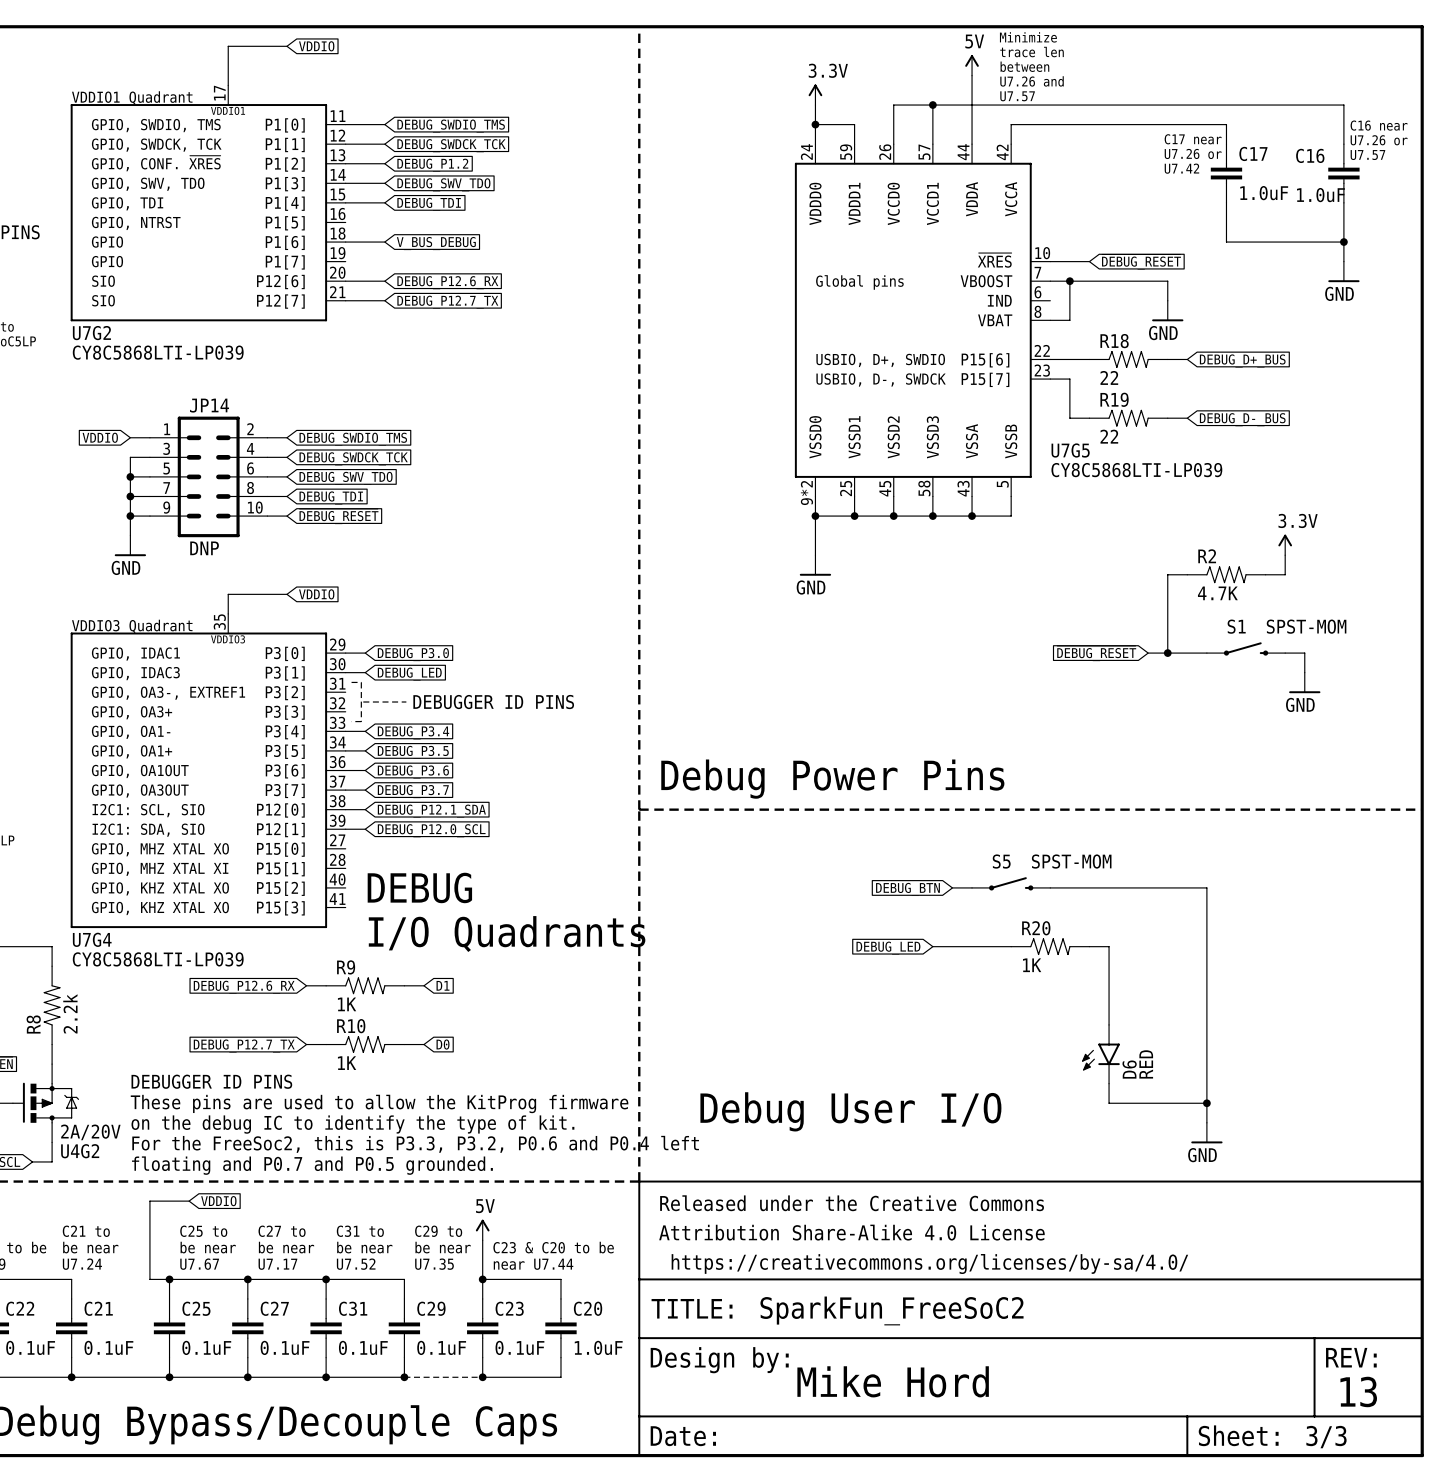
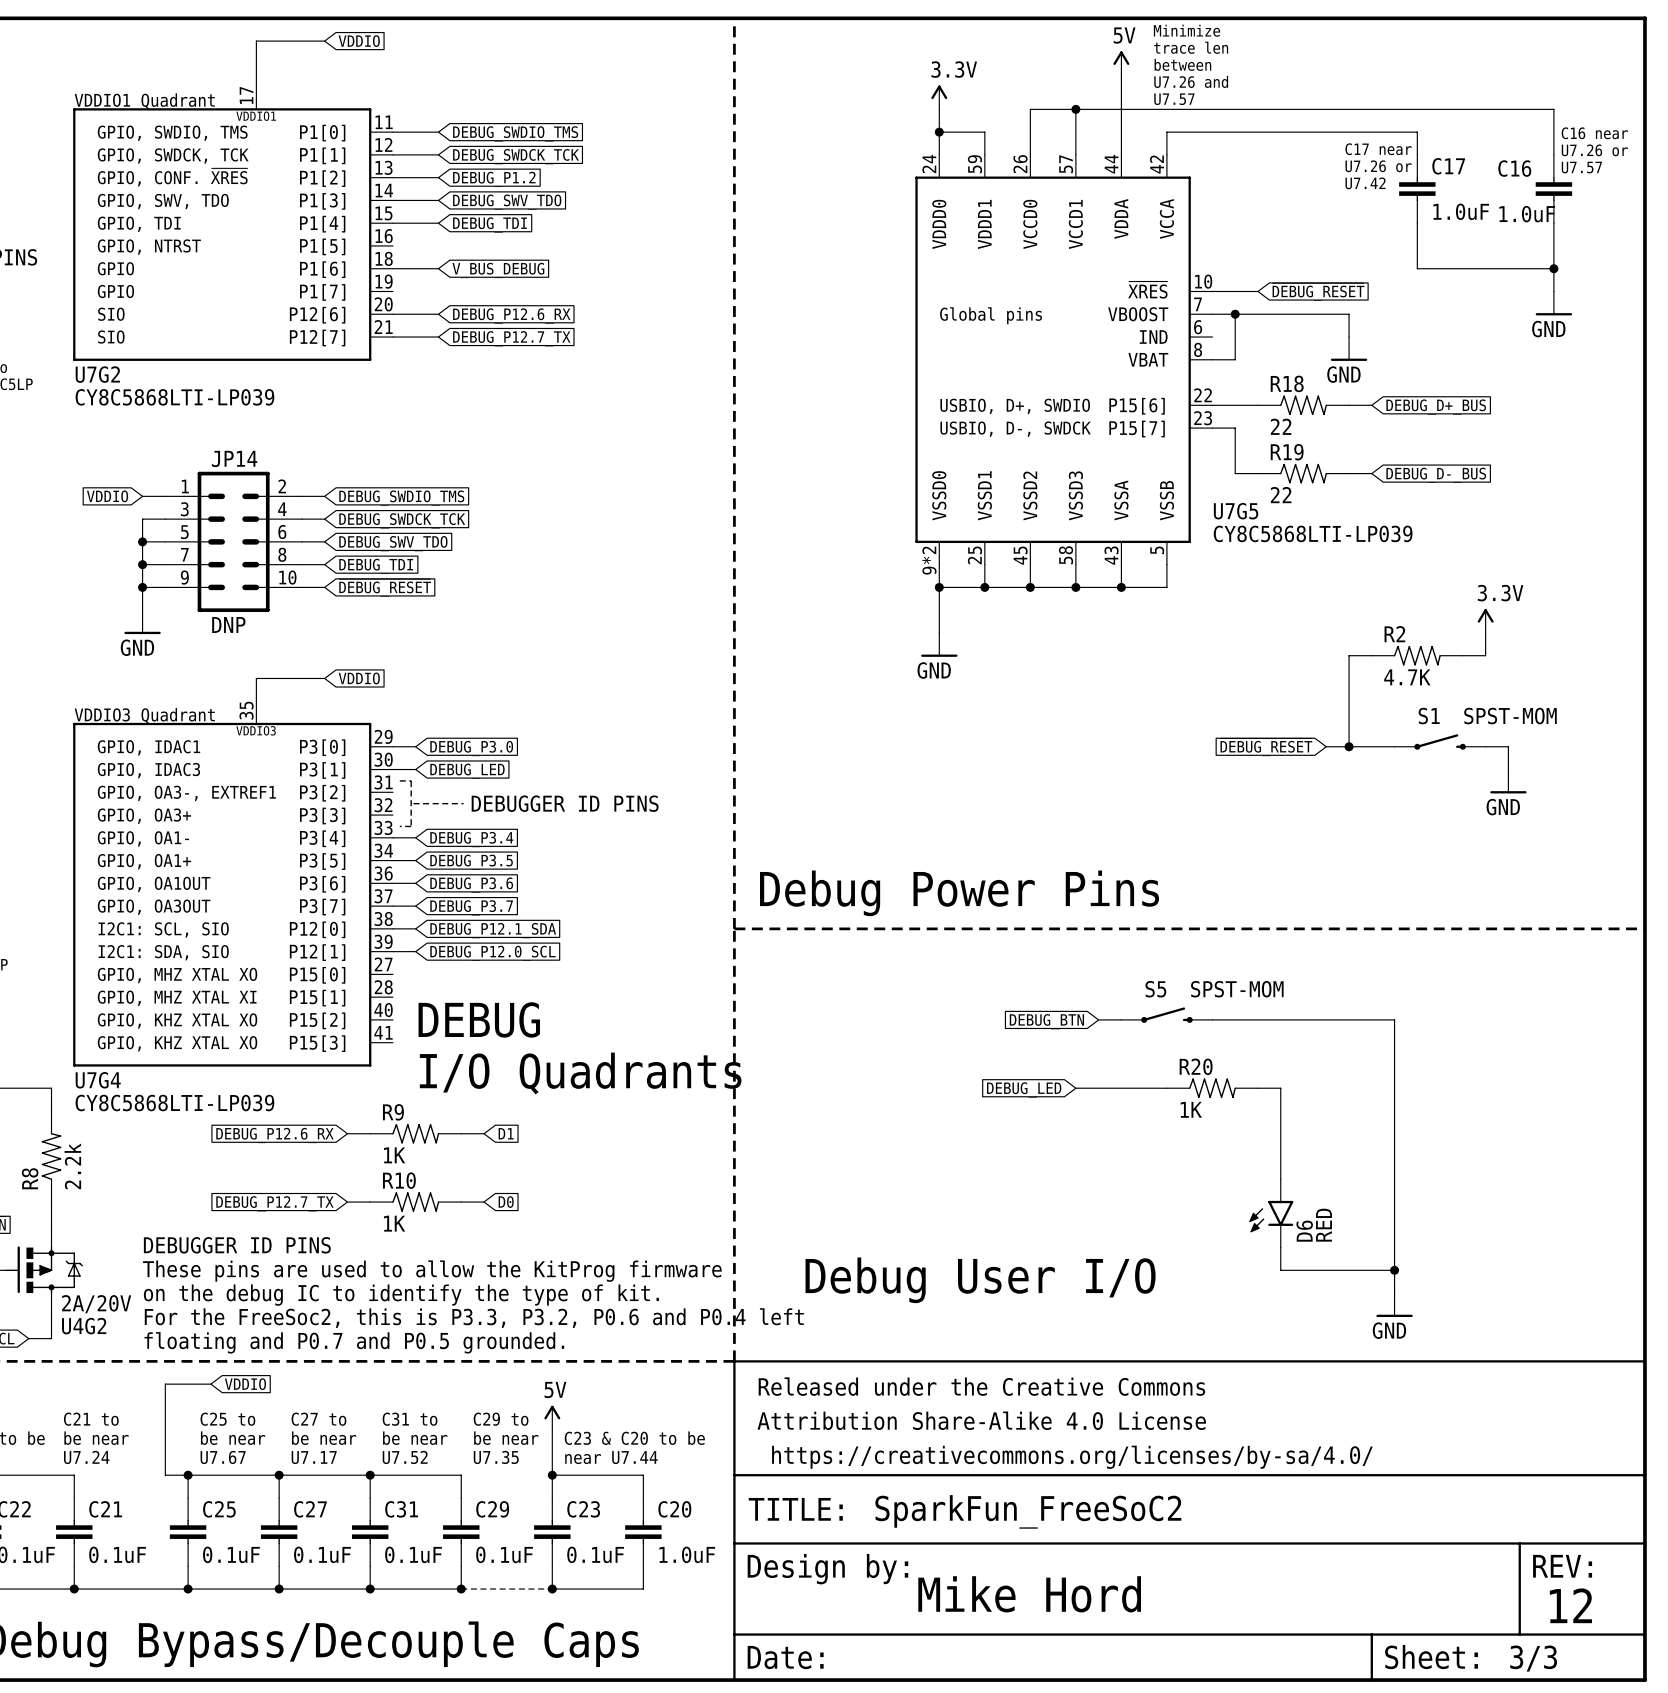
text: 13 (1358, 1391) -> 12 (1570, 1605)

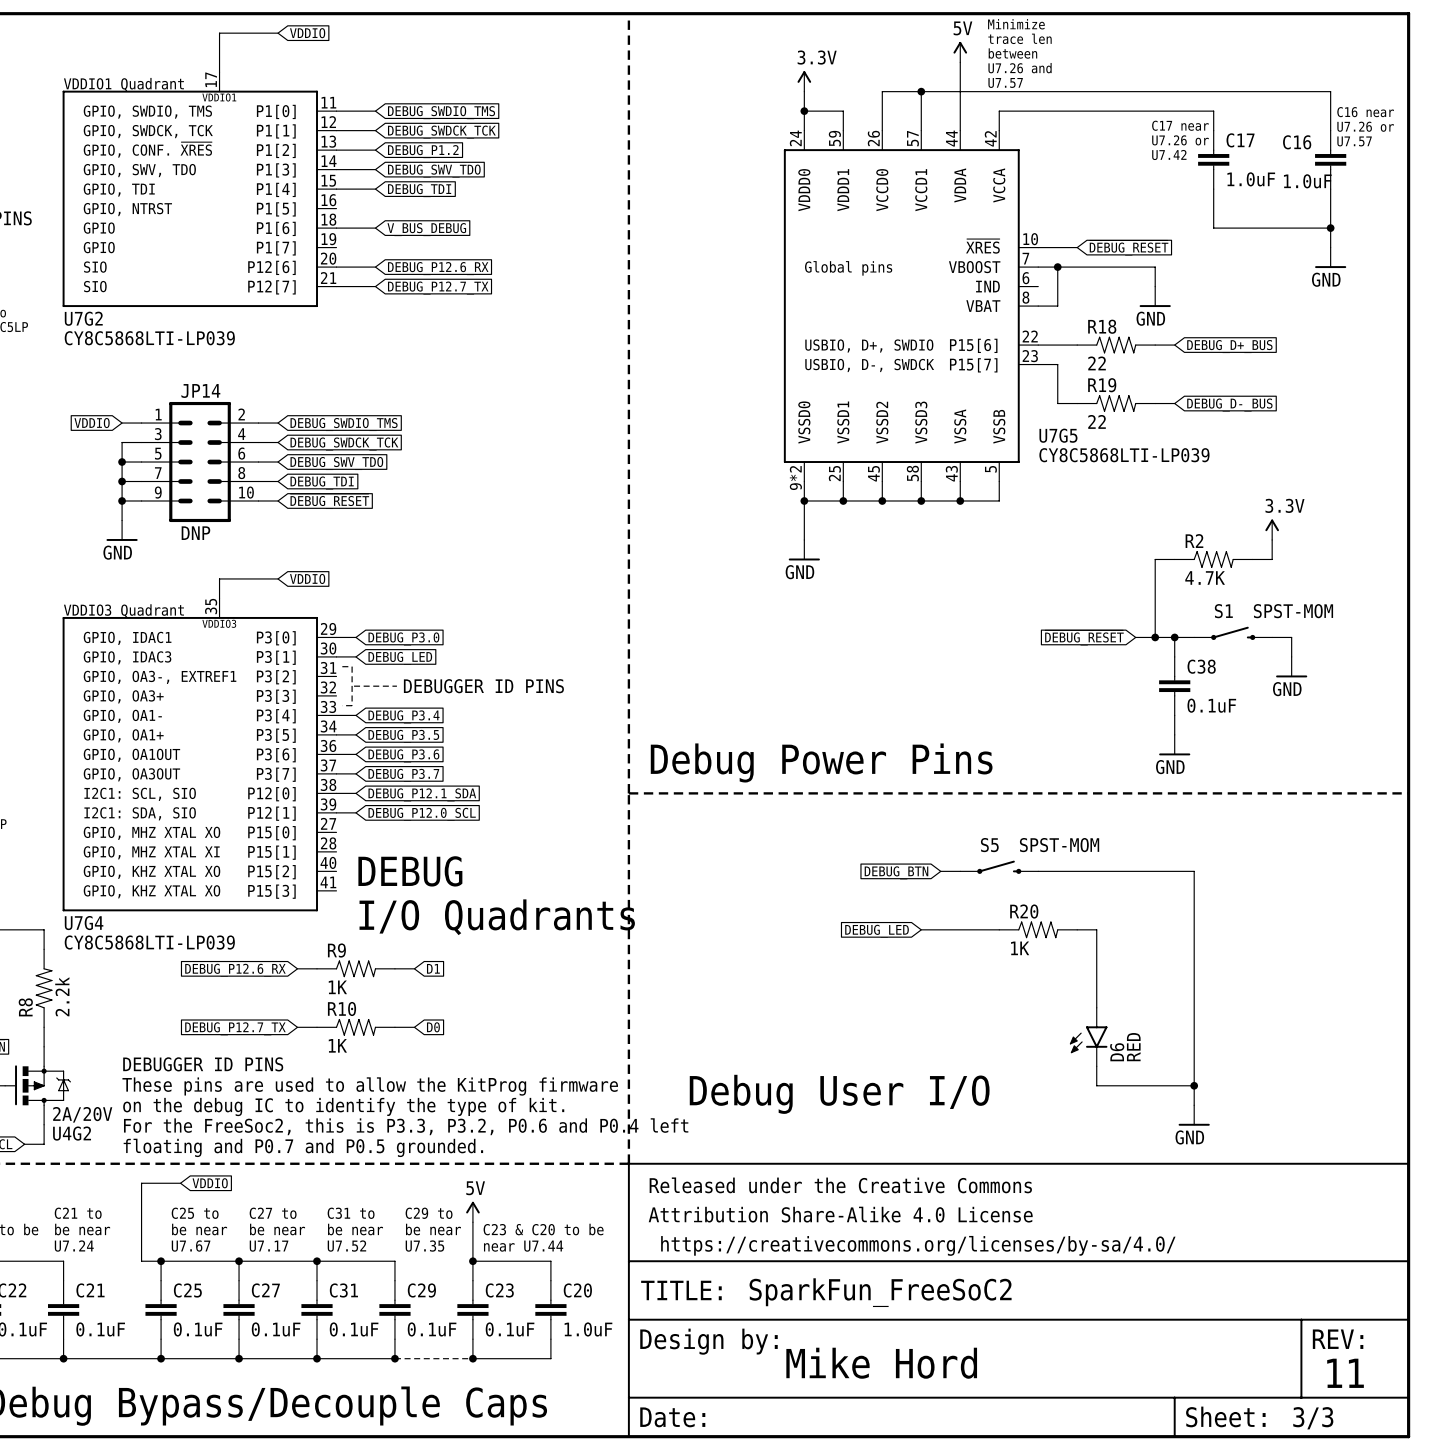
wire: none -> (1174, 637) (1174, 656)
junction: none -> (1174, 637)
C38: none -> 0.1uF (1174, 686)
wire: none -> (1174, 715) (1174, 734)
power symbol: none -> GND (1174, 745)
text: 12 (1570, 1605) -> 11 (1345, 1373)

